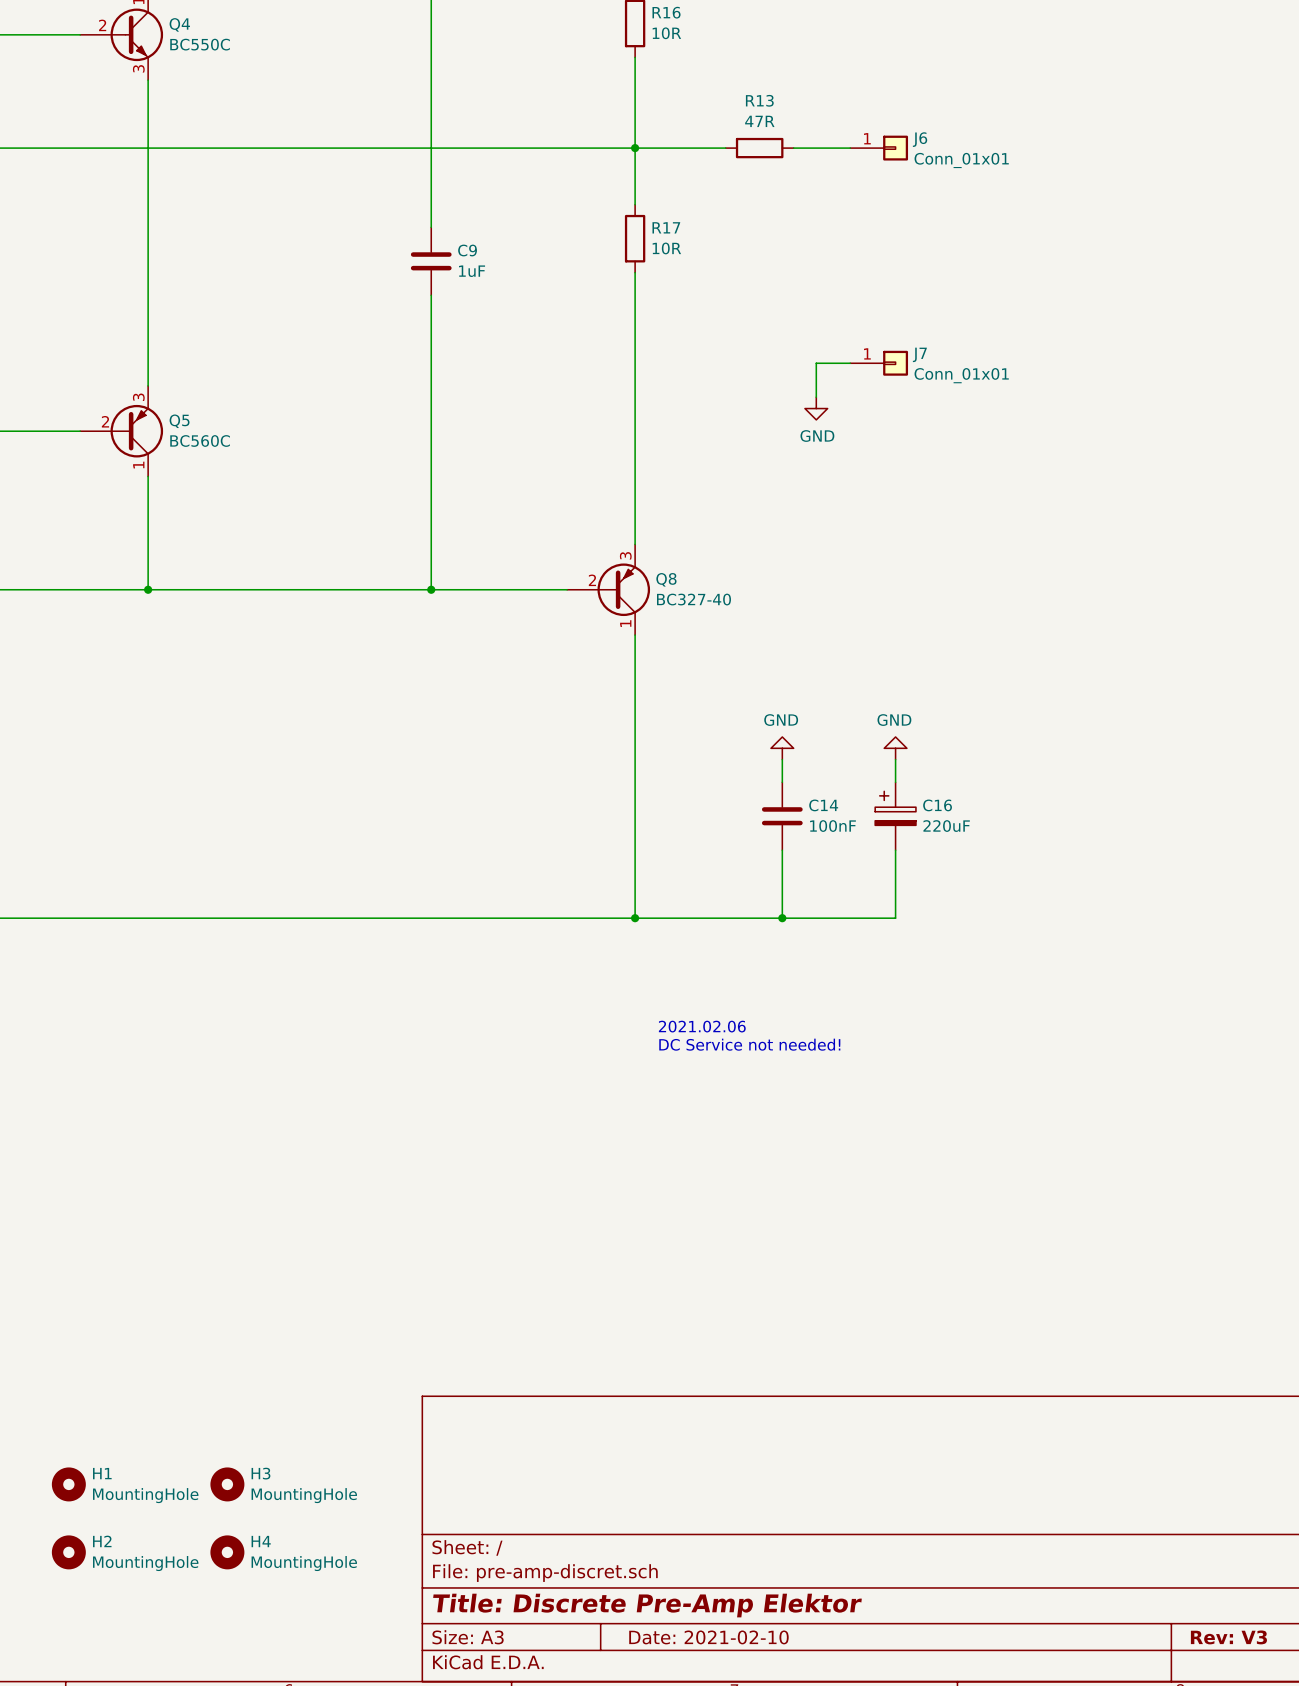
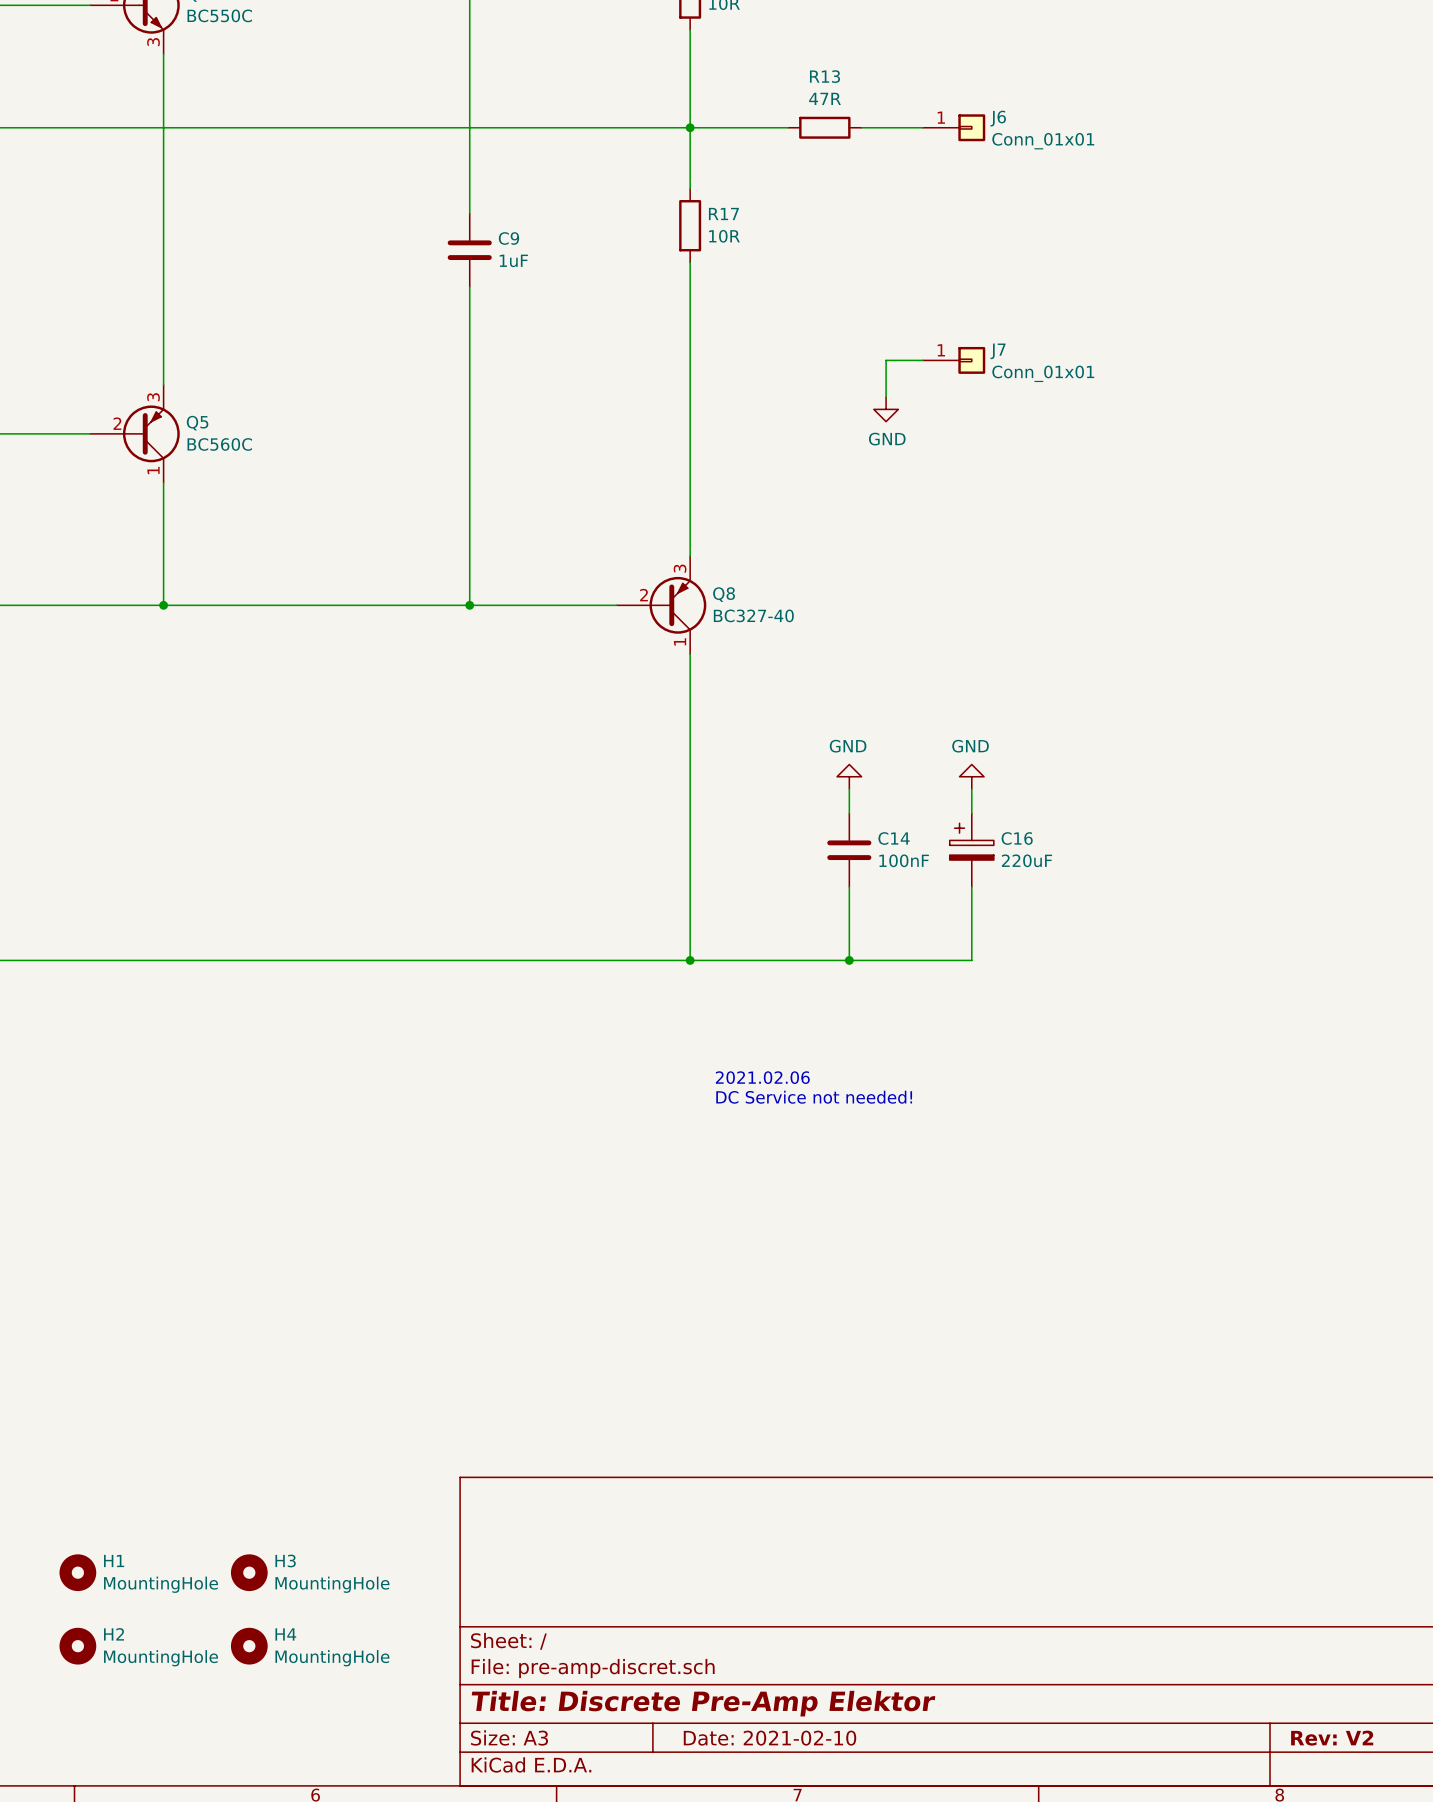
title block: Rev: V3 (1228, 1637) -> Rev: V2 (1332, 1738)

